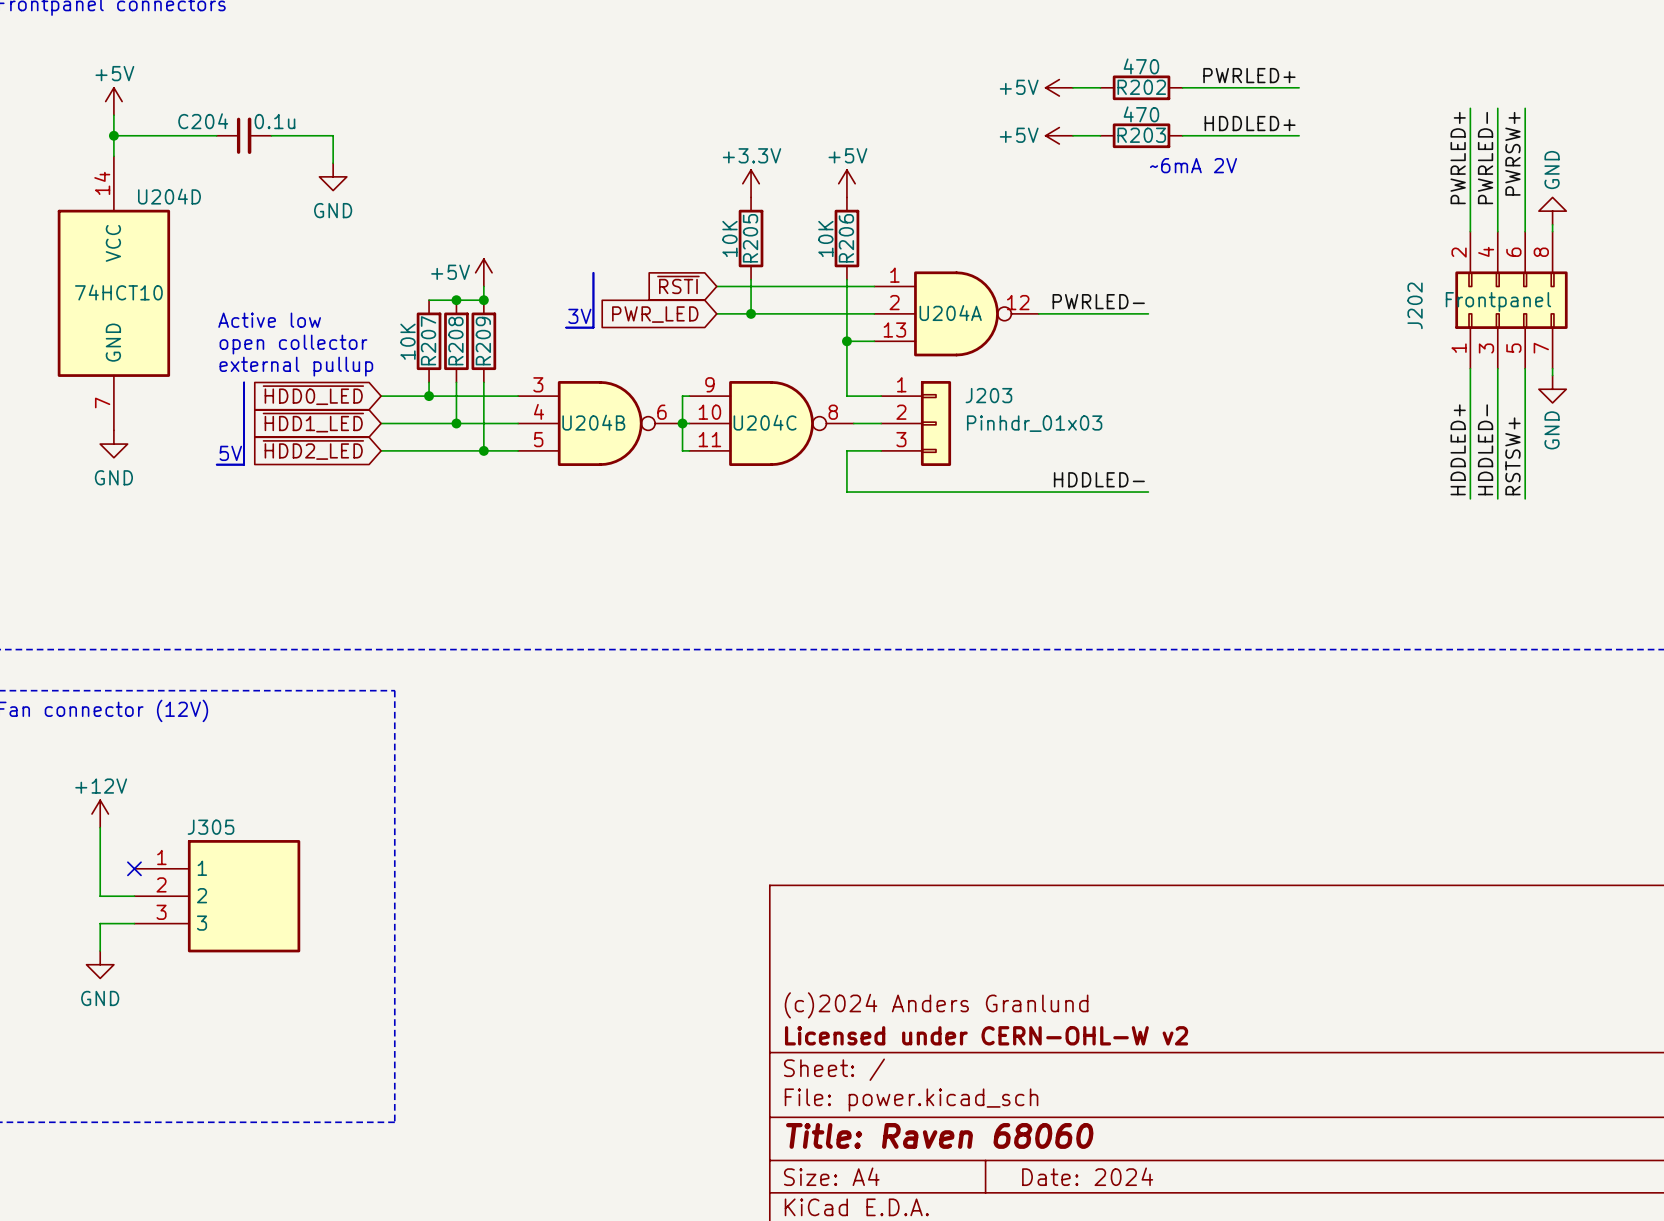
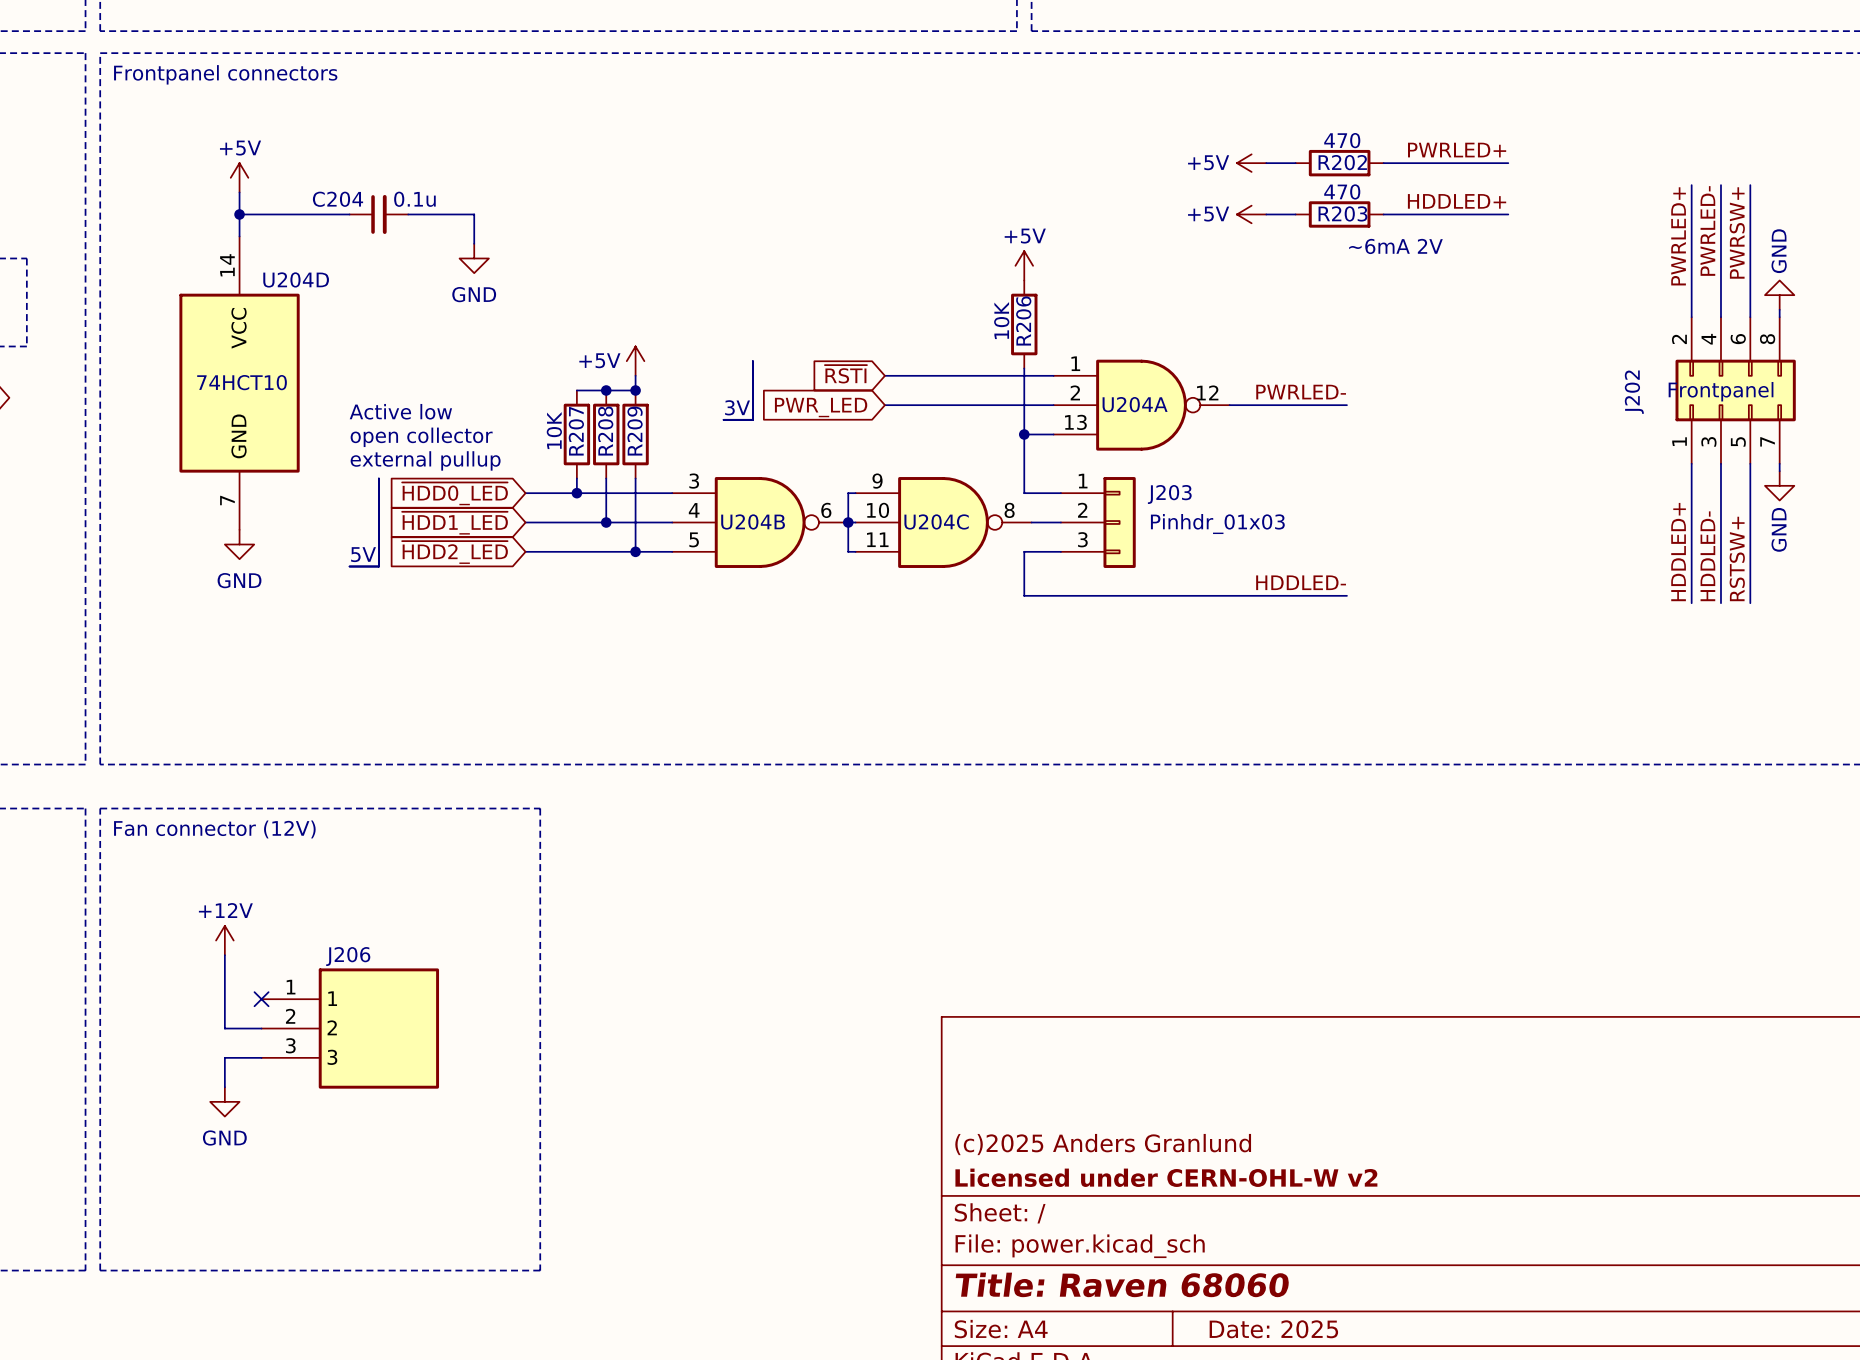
power symbol: +3.3V (751, 183) -> none
R205: 10K (751, 238) -> none
wire: (751, 279) (751, 313) -> none
junction: (751, 313) -> none
J305 name: J305 (211, 827) -> J206 (348, 956)
title block: (c)2024 Anders Granlund (936, 1005) -> (c)2025 Anders Granlund (1103, 1144)
title block: Date: 2024 (1087, 1176) -> Date: 2025 (1273, 1329)

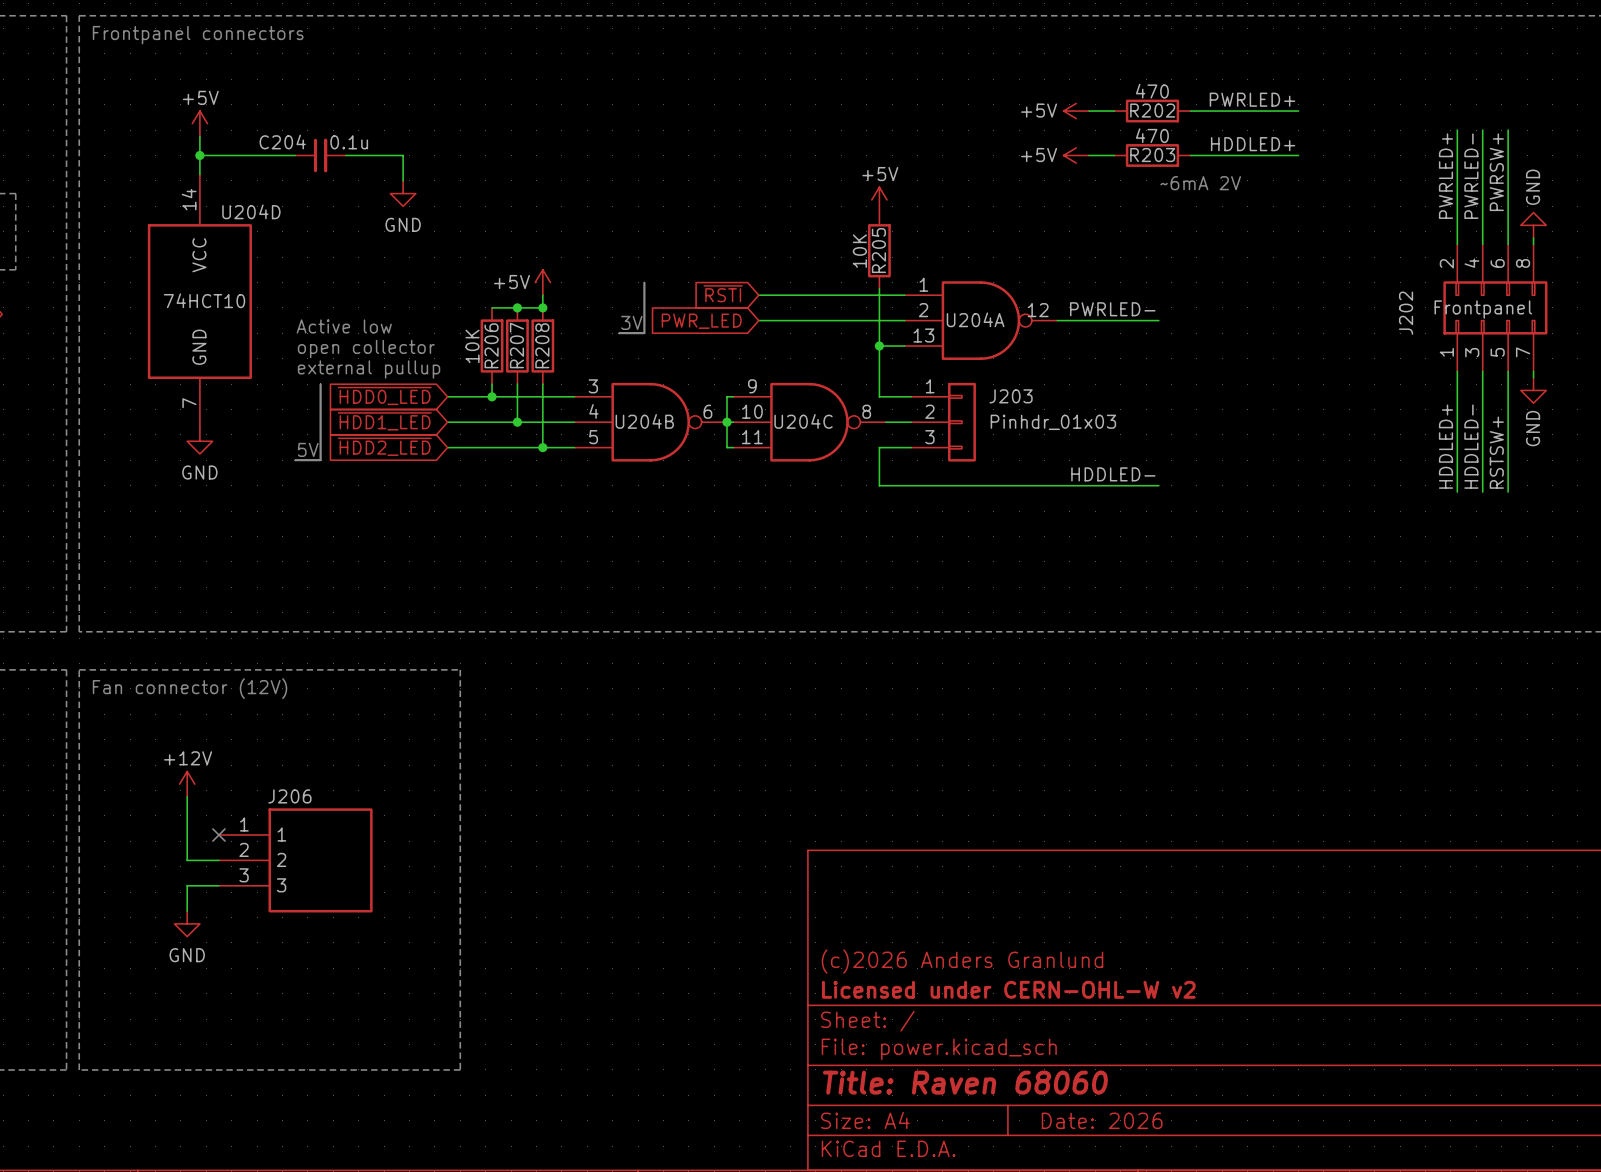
R206 name: R206 (1023, 320) -> R205 (878, 250)
R207 name: R207 (576, 431) -> R206 (491, 345)
R208 name: R208 (605, 431) -> R207 (516, 345)
R209 name: R209 (635, 431) -> R208 (542, 345)
title block: (c)2025 Anders Granlund (1103, 1144) -> (c)2026 Anders Granlund (962, 961)
title block: Date: 2025 (1273, 1329) -> Date: 2026 (1102, 1120)

